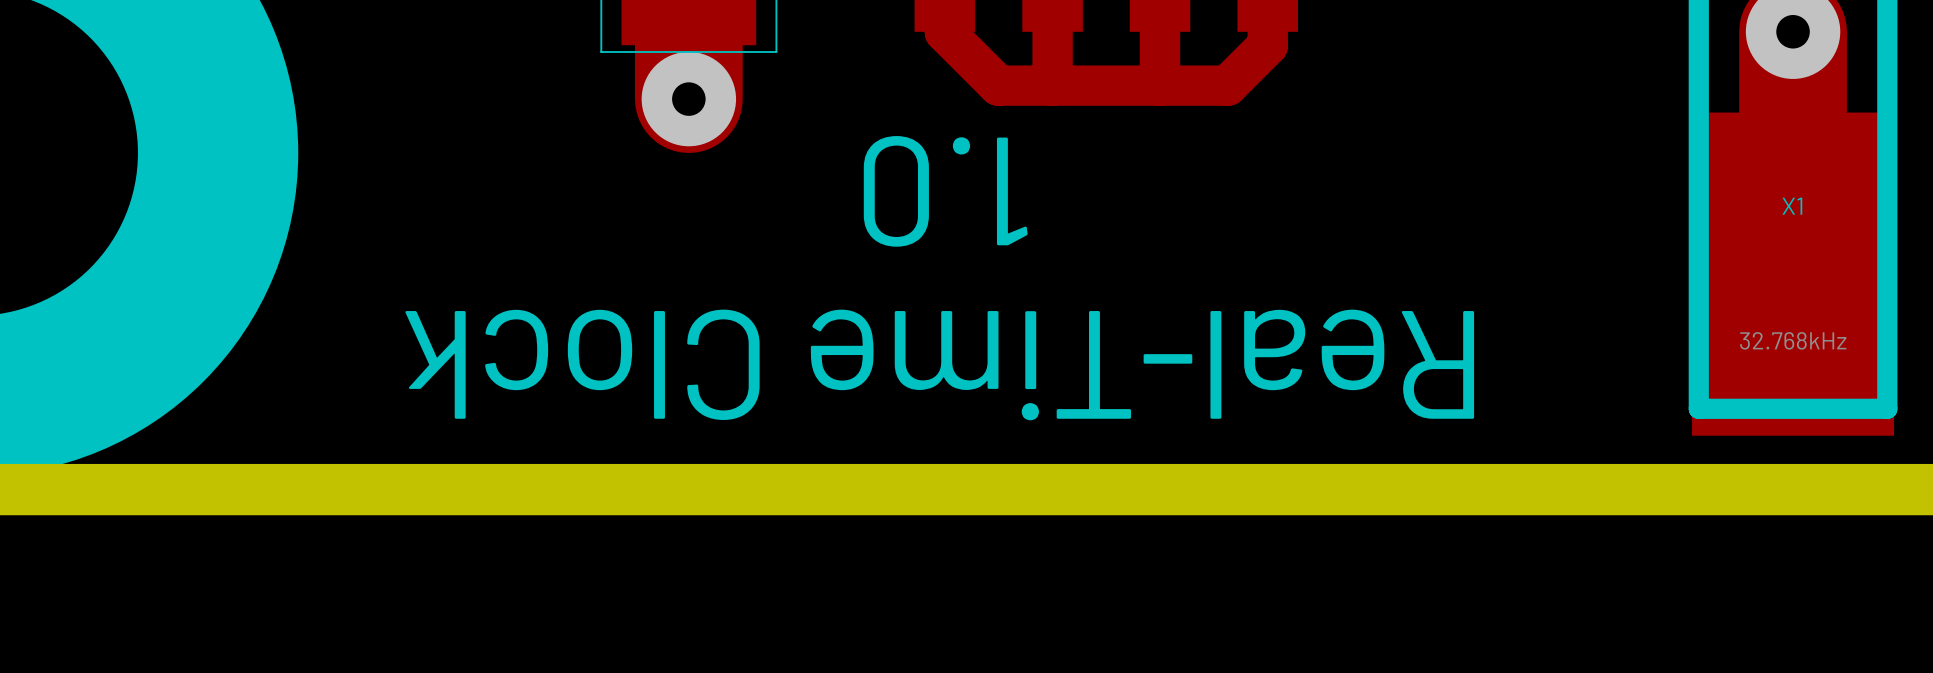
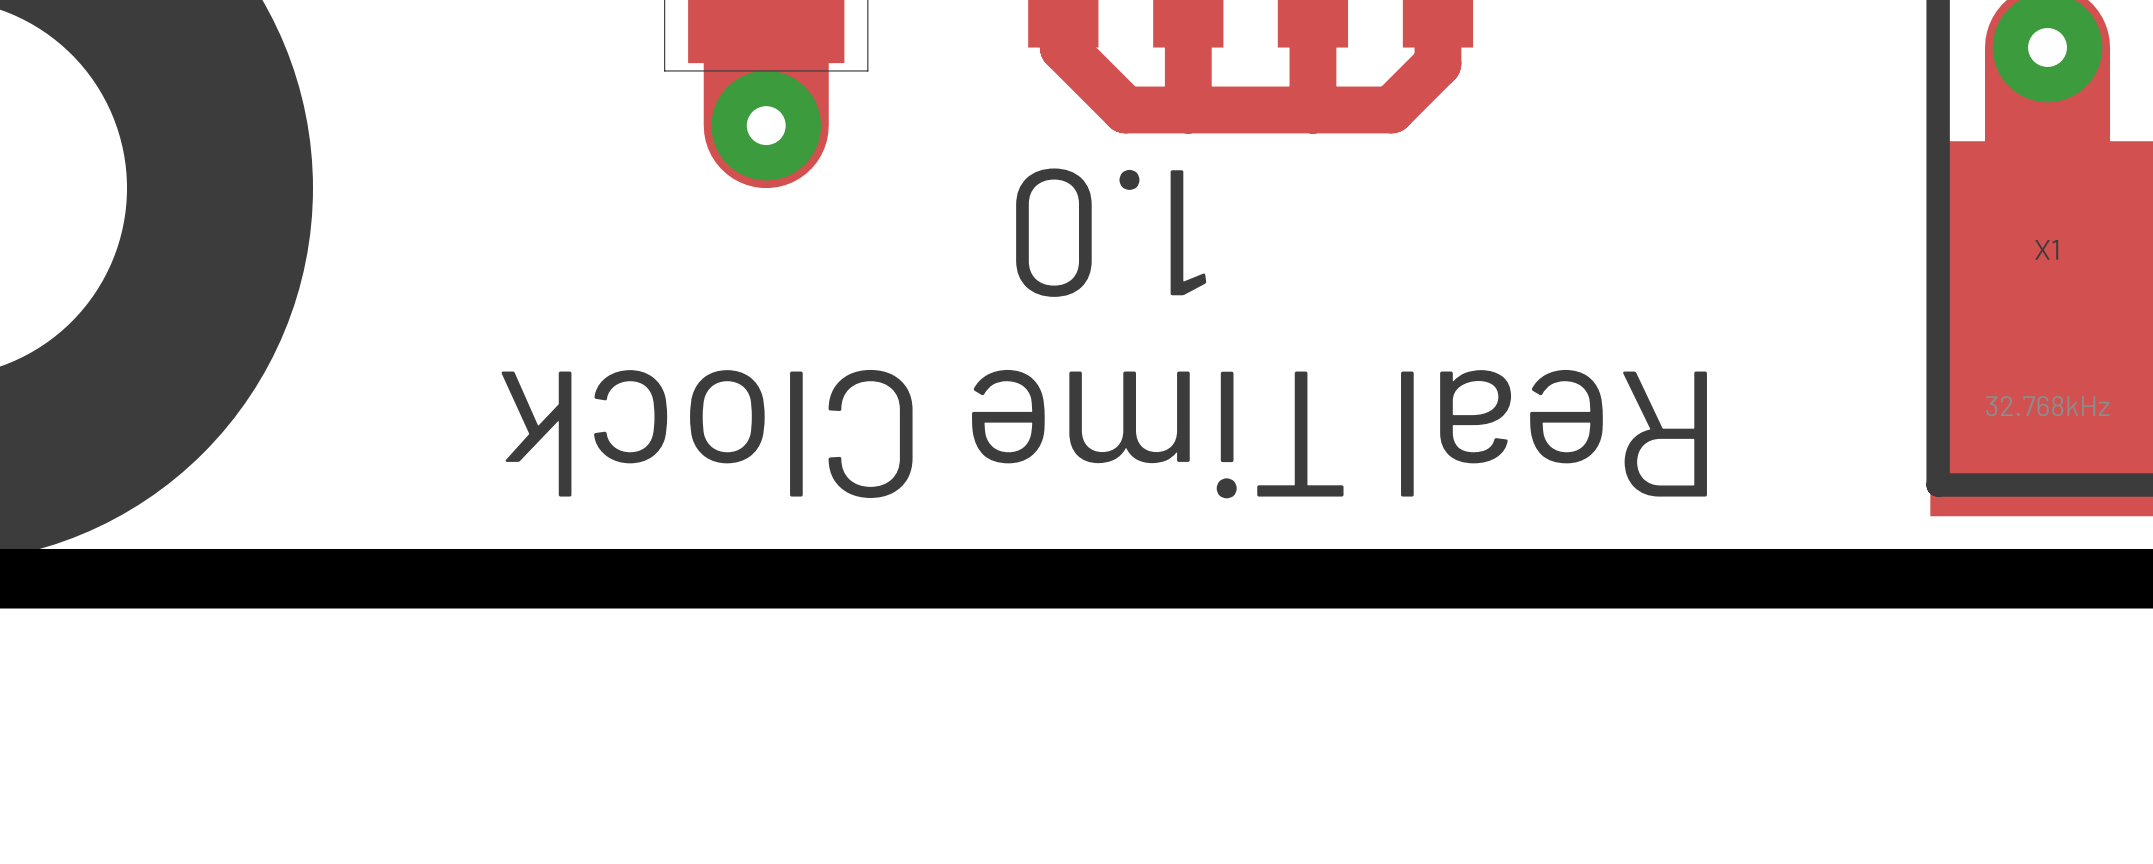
text position: 1.0 (945, 191) -> 1.0 (1111, 232)
text: Real-Time Clock (939, 364) -> Real Time Clock (1104, 434)

